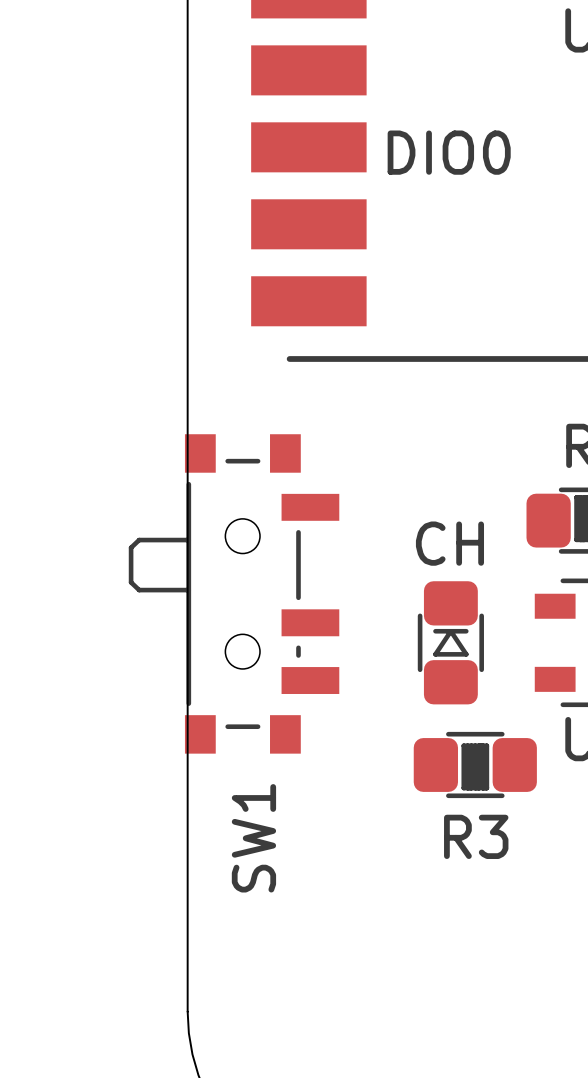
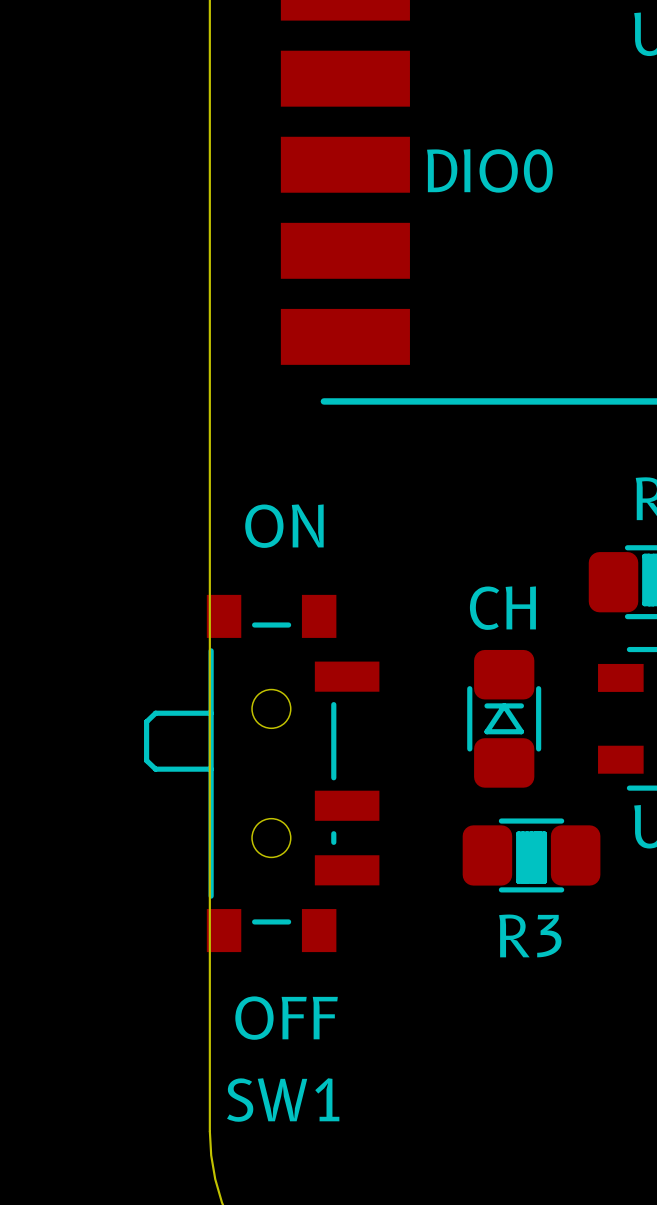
text: none -> ON (284, 526)
SW1 position: (234, 593) -> (261, 773)
SW1 name rotation: 0° (253, 838) -> 90° clockwise (283, 1100)
text: none -> OFF (286, 1018)

